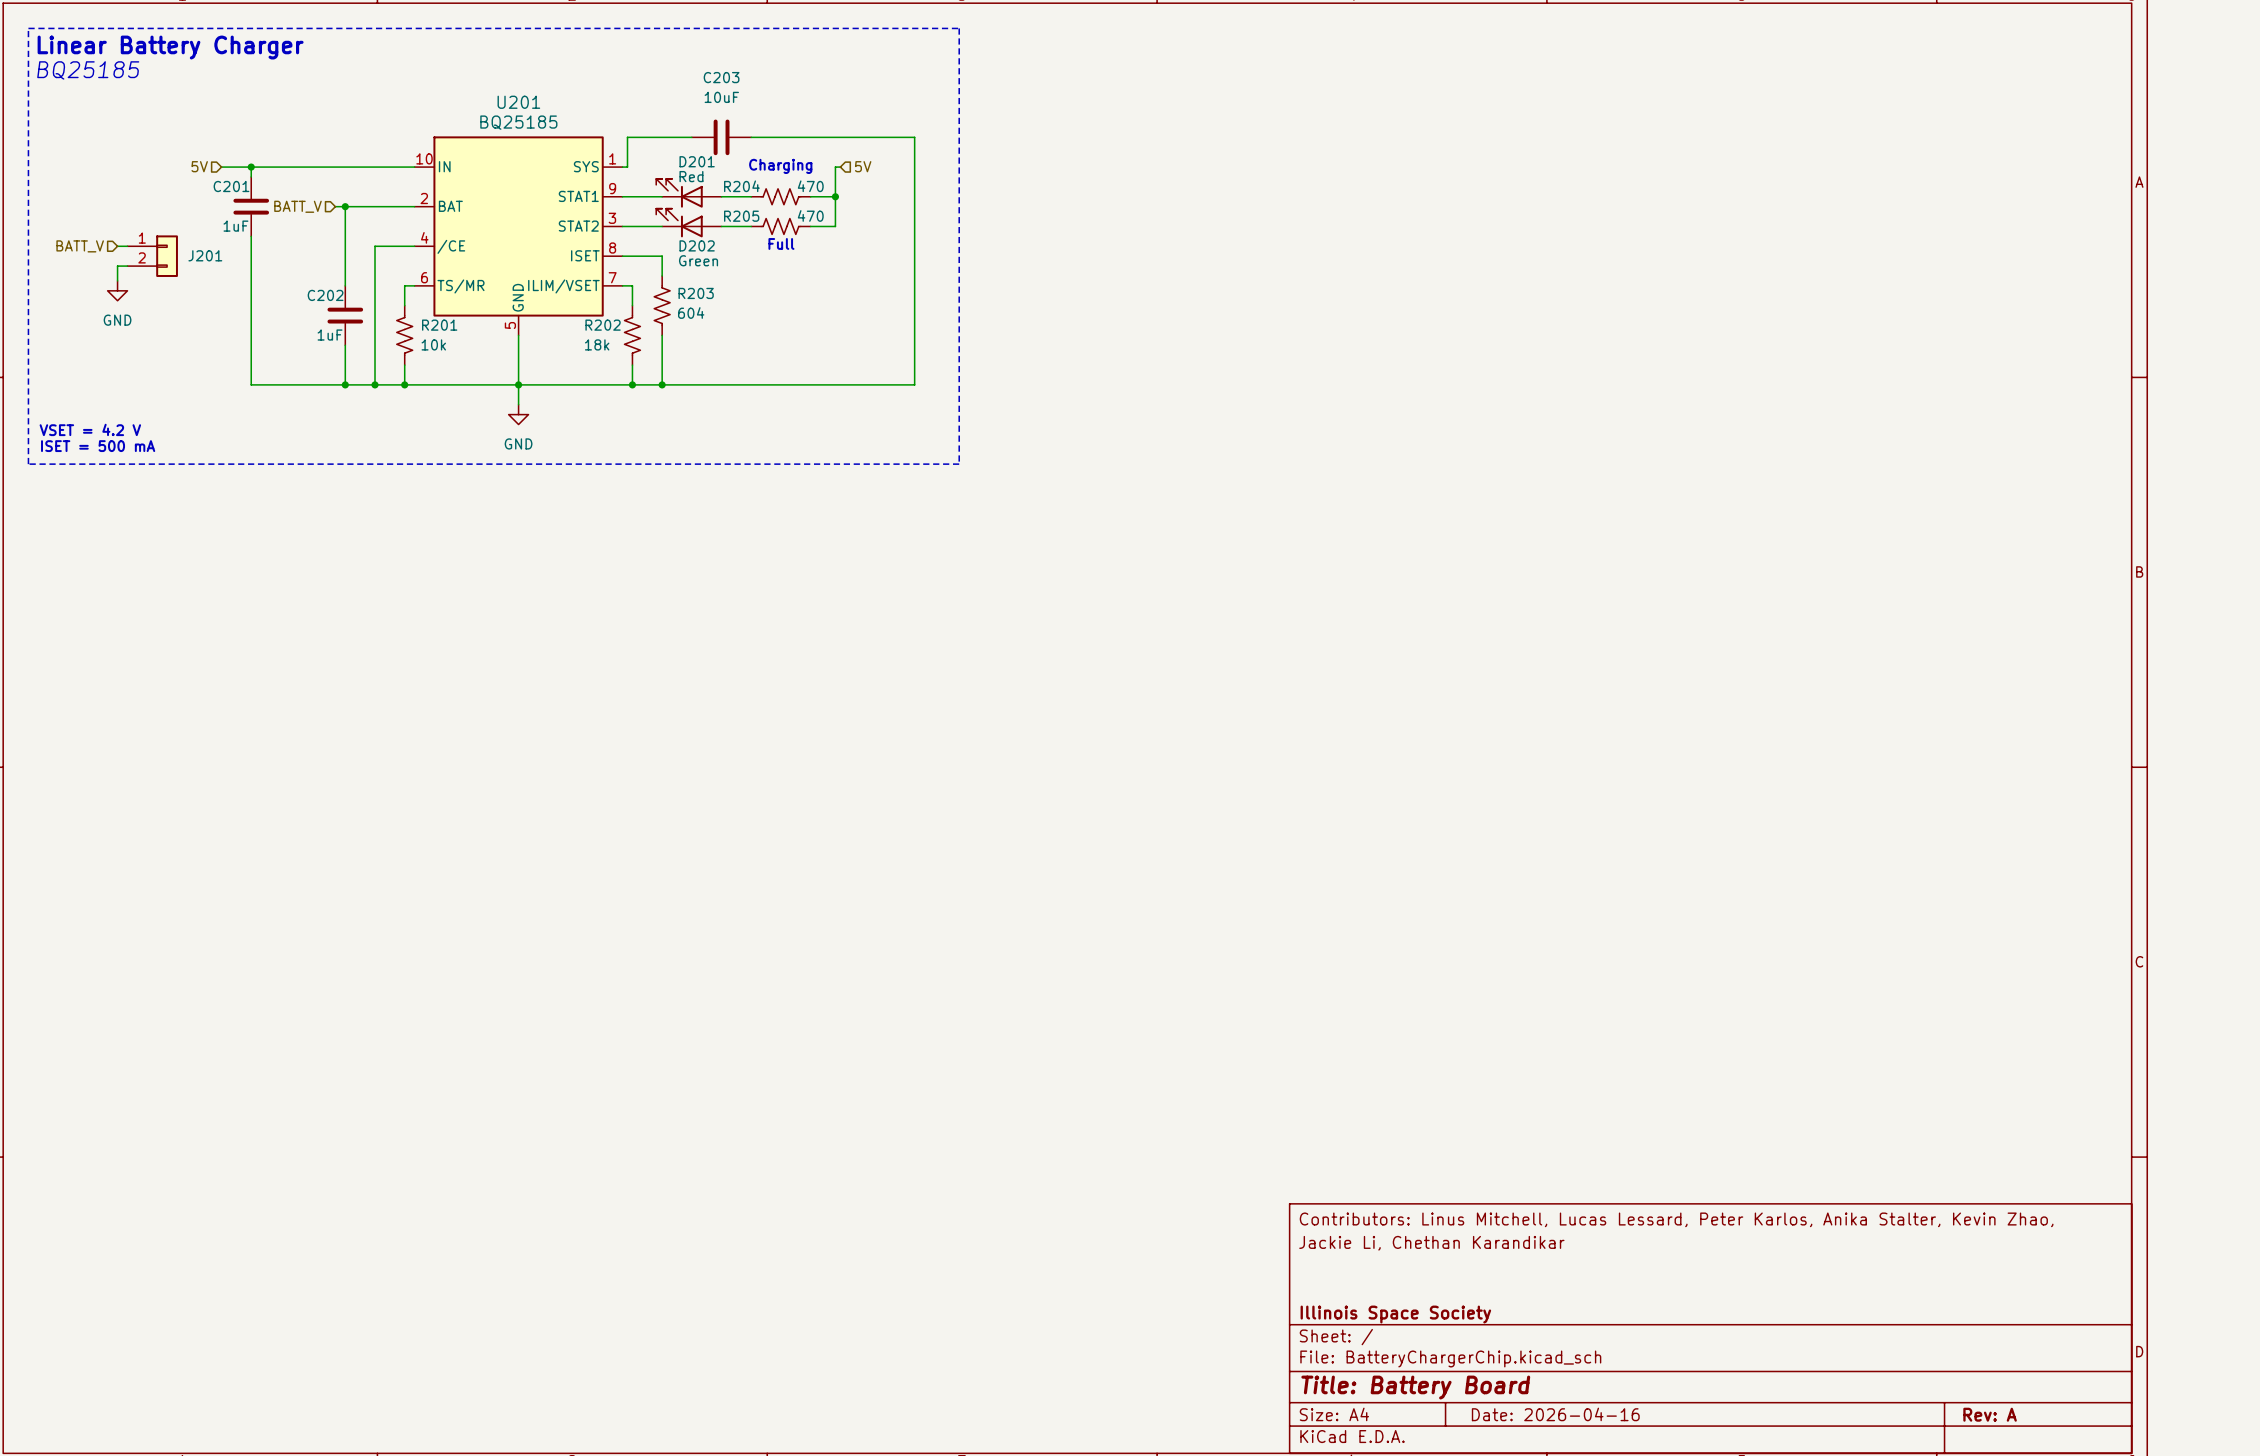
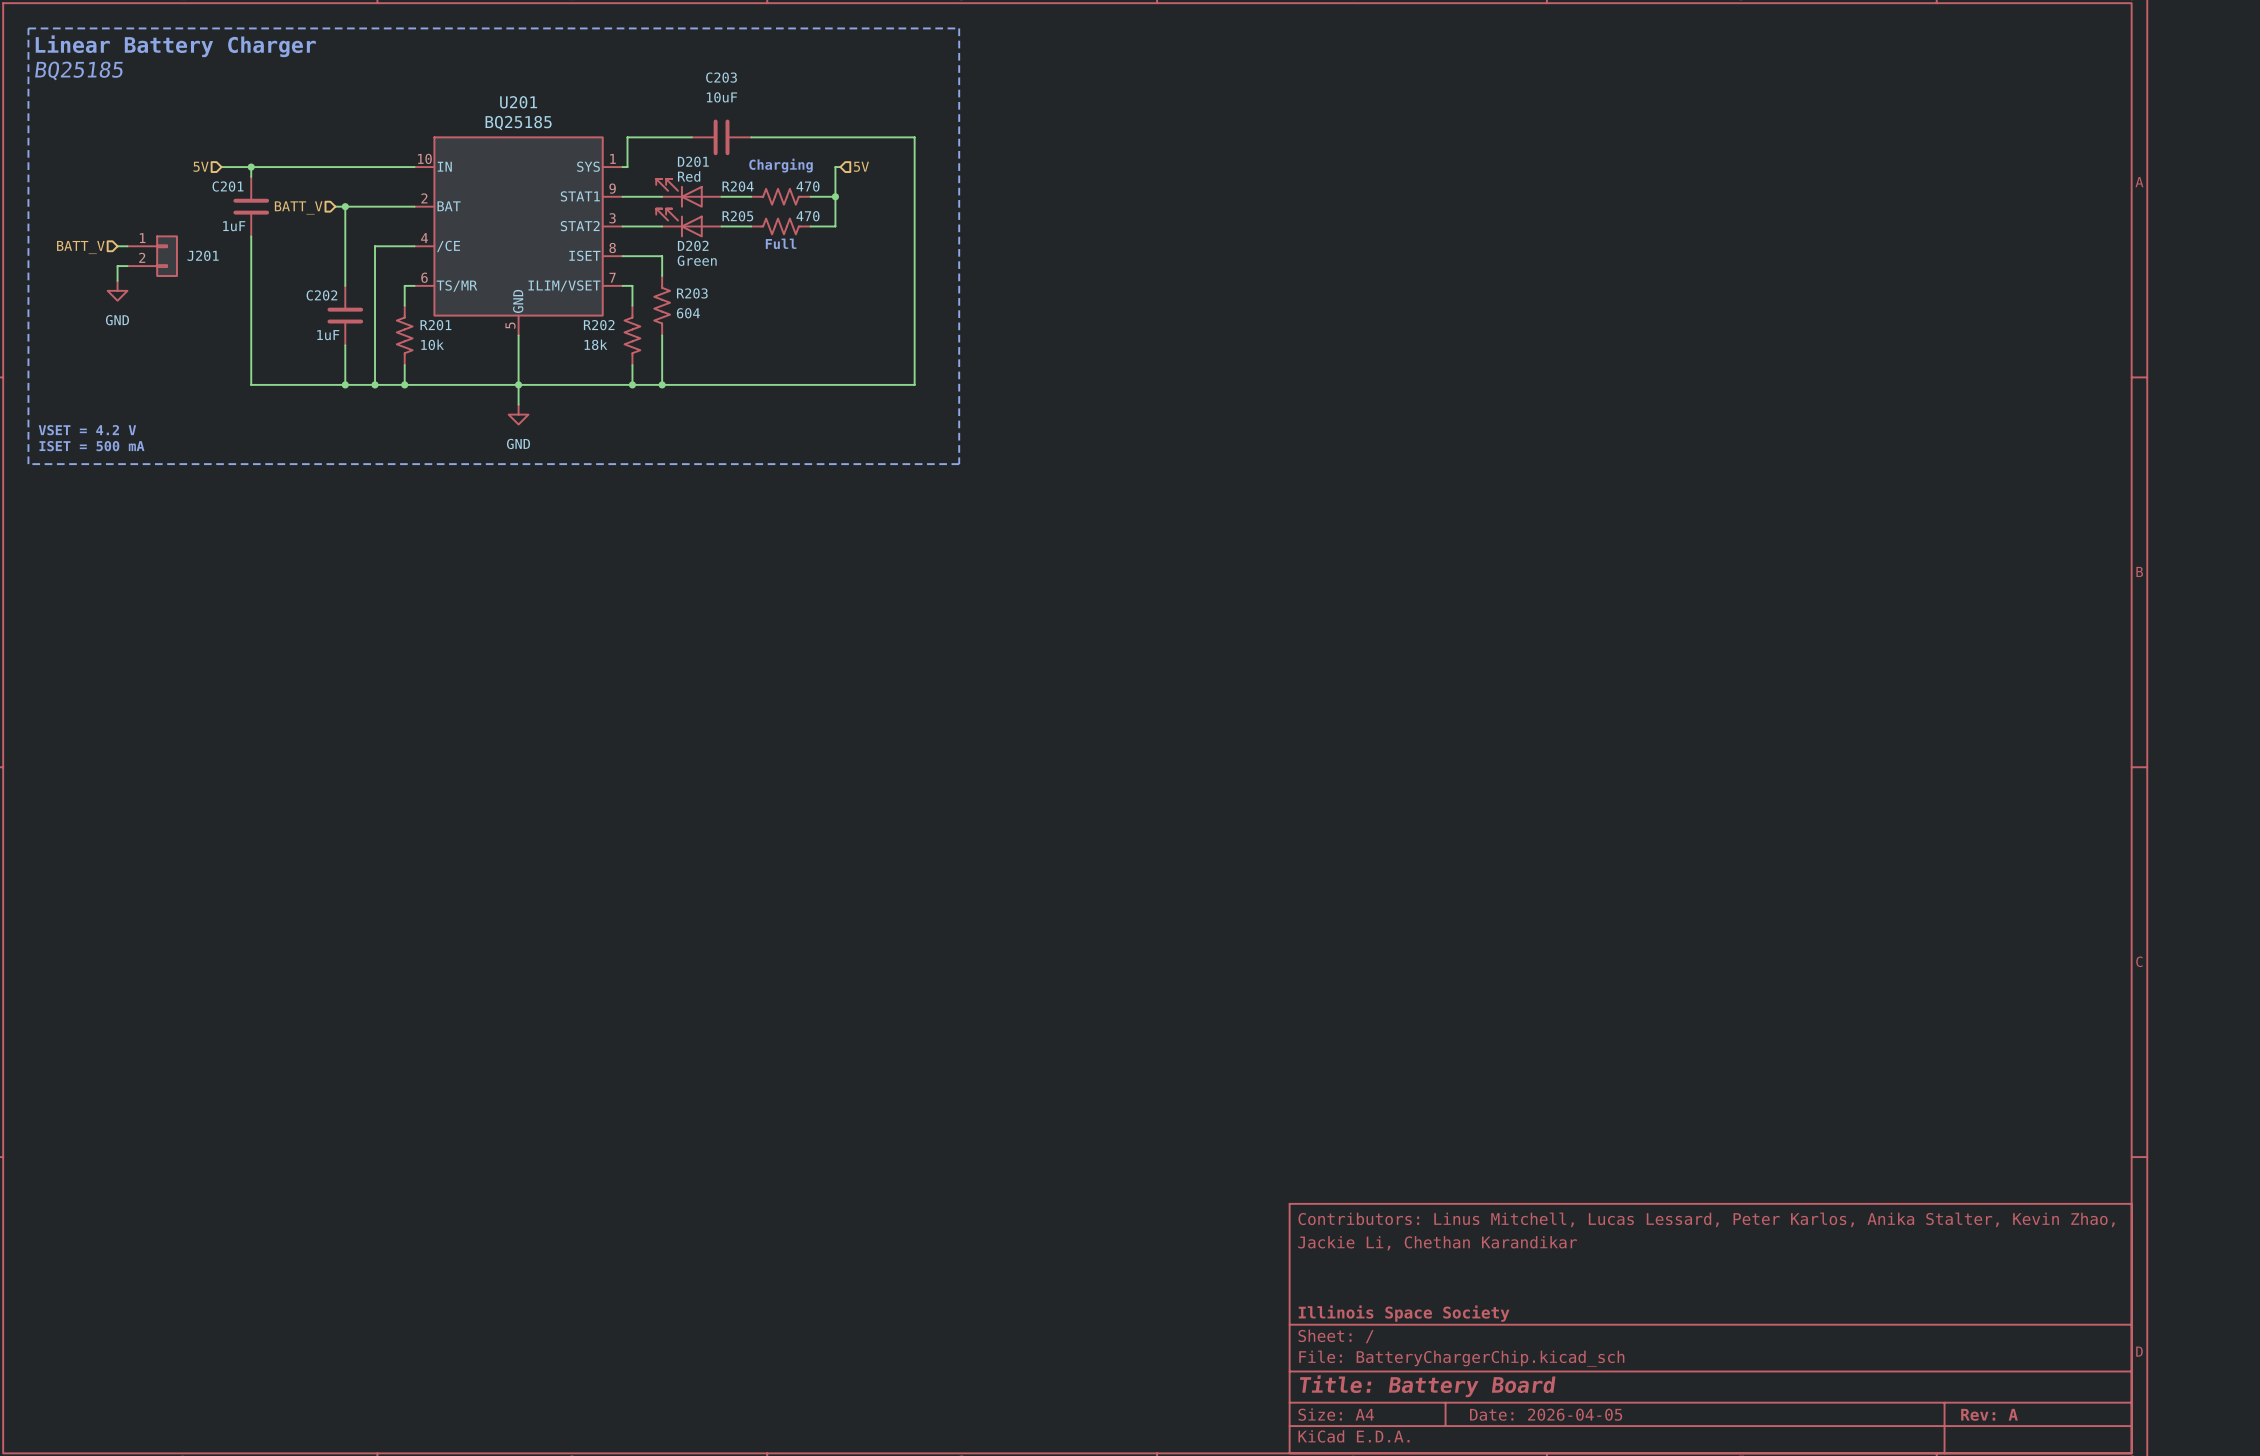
title block: Date: 2026-04-16 (1555, 1414) -> Date: 2026-04-05 (1546, 1414)

